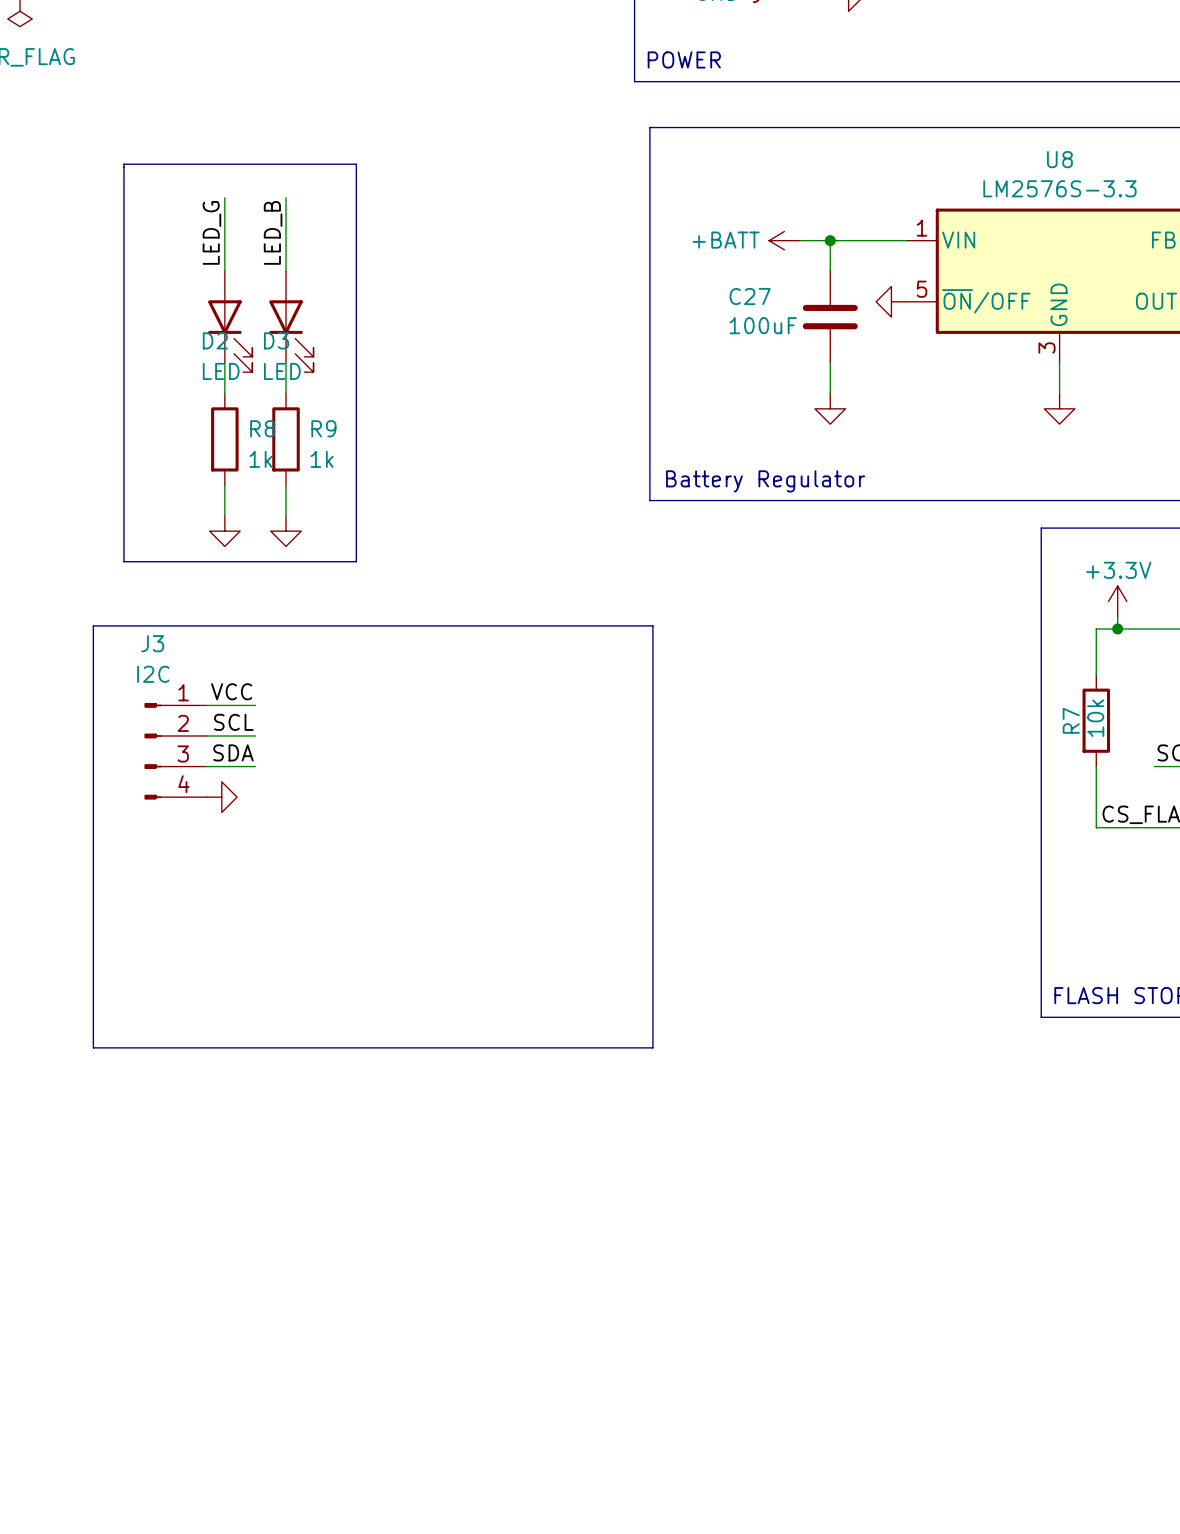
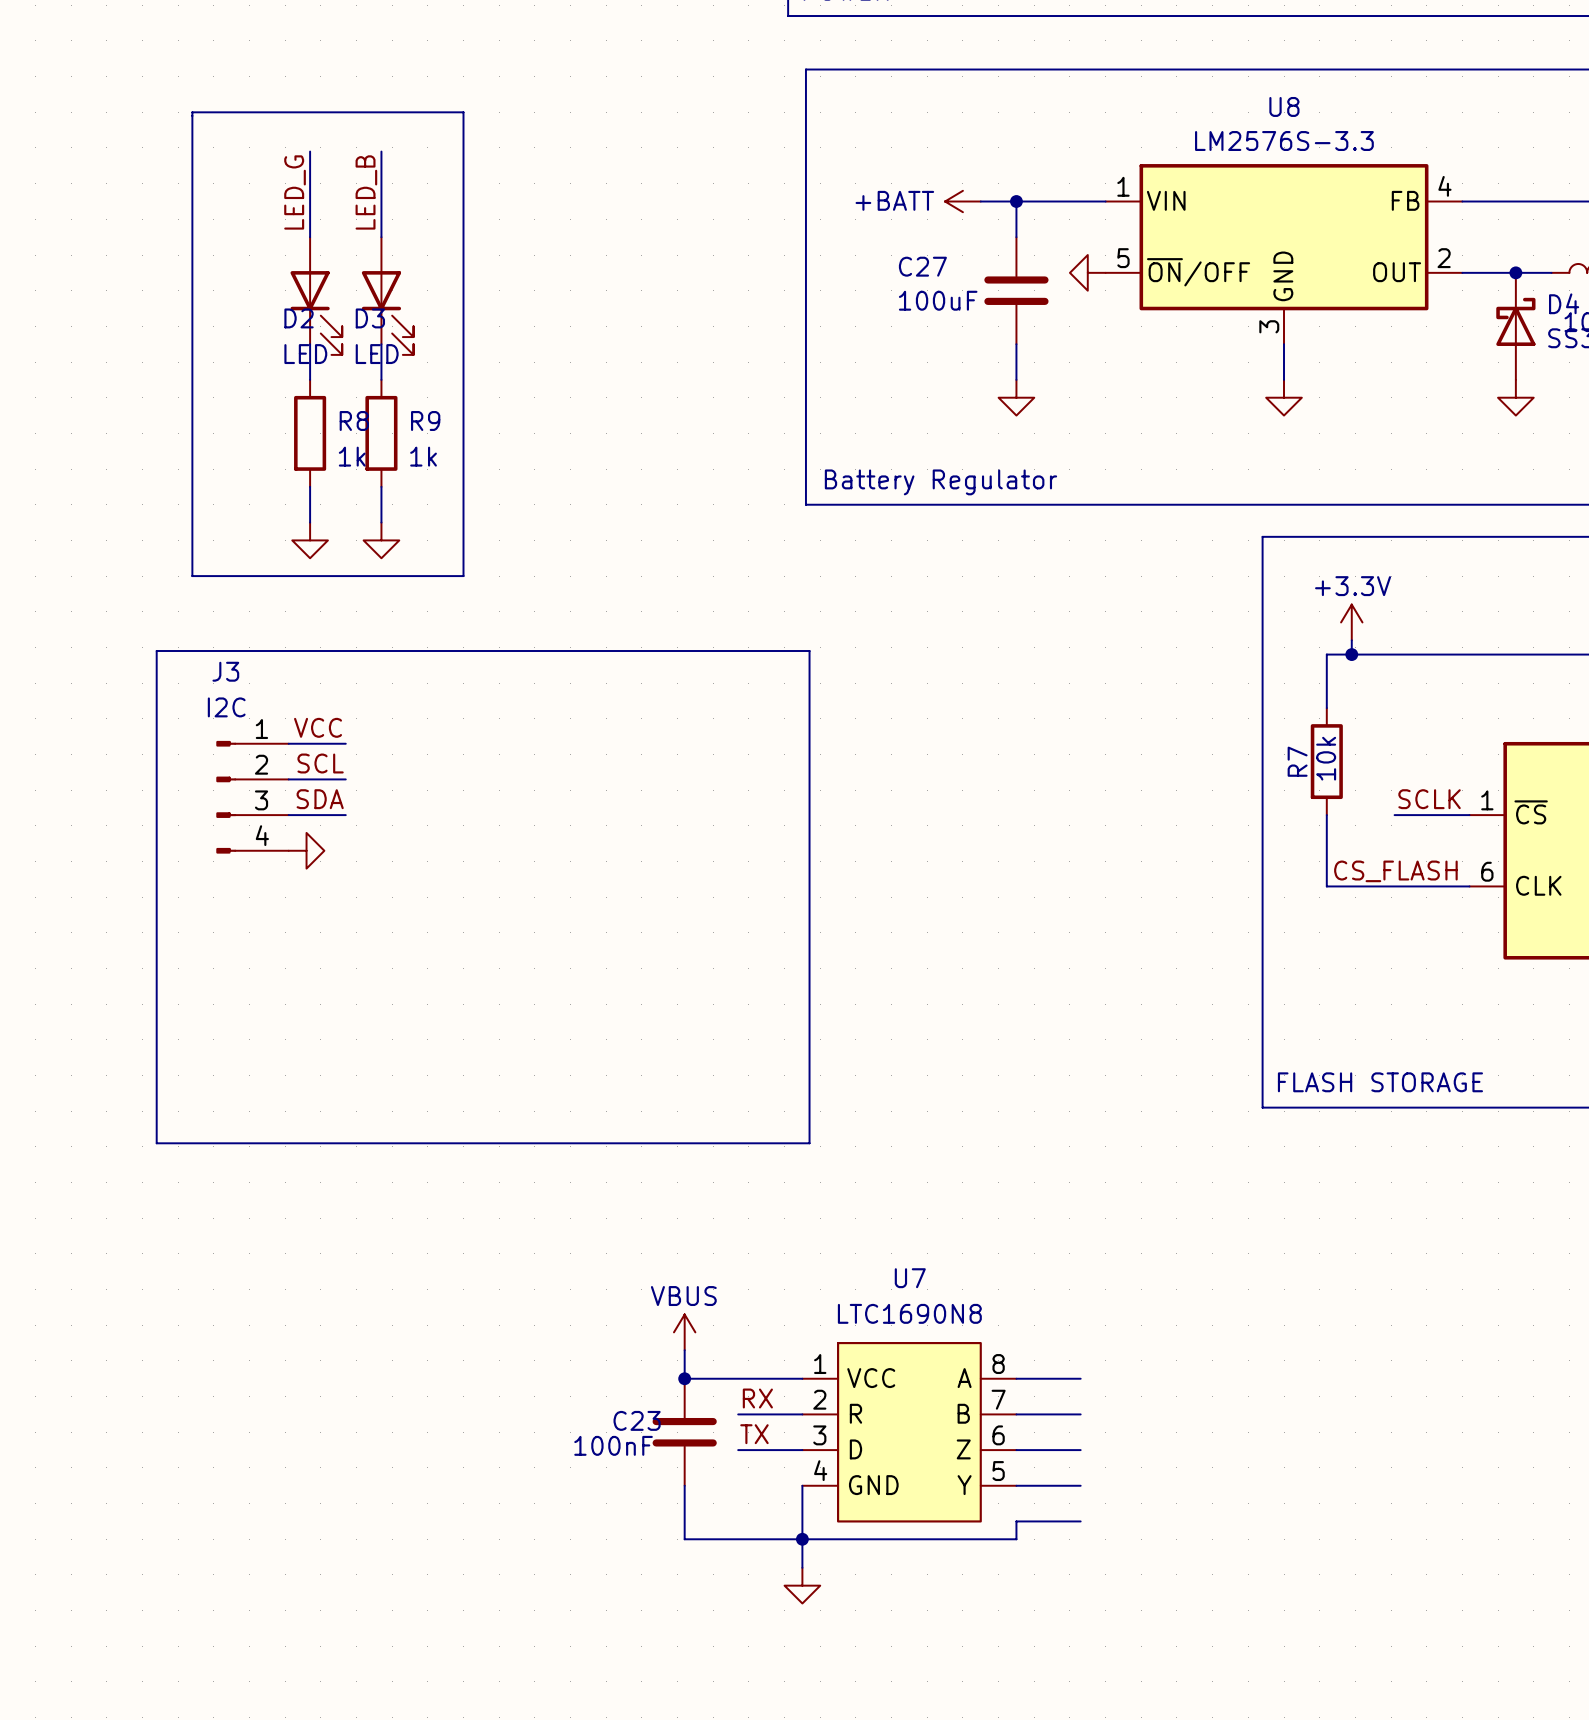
power symbol: none -> VBUS (684, 1332)
wire: none -> (684, 1350) (684, 1378) (802, 1378)
junction: none -> (684, 1378)
wire: none -> (1016, 1378) (1080, 1378)
label: none -> RX (757, 1398)
wire: none -> (738, 1414) (802, 1414)
wire: none -> (1016, 1414) (1080, 1414)
C23: none -> 100nF (684, 1432)
U7: none -> LTC1690N8 (909, 1432)
label: none -> TX (754, 1434)
wire: none -> (738, 1450) (802, 1450)
wire: none -> (1016, 1450) (1080, 1450)
wire: none -> (684, 1485) (684, 1539) (1016, 1539) (1016, 1521) (1080, 1521)
wire: none -> (802, 1485) (802, 1567)
wire: none -> (1016, 1485) (1080, 1485)
junction: none -> (802, 1539)
power symbol: none -> (802, 1585)

